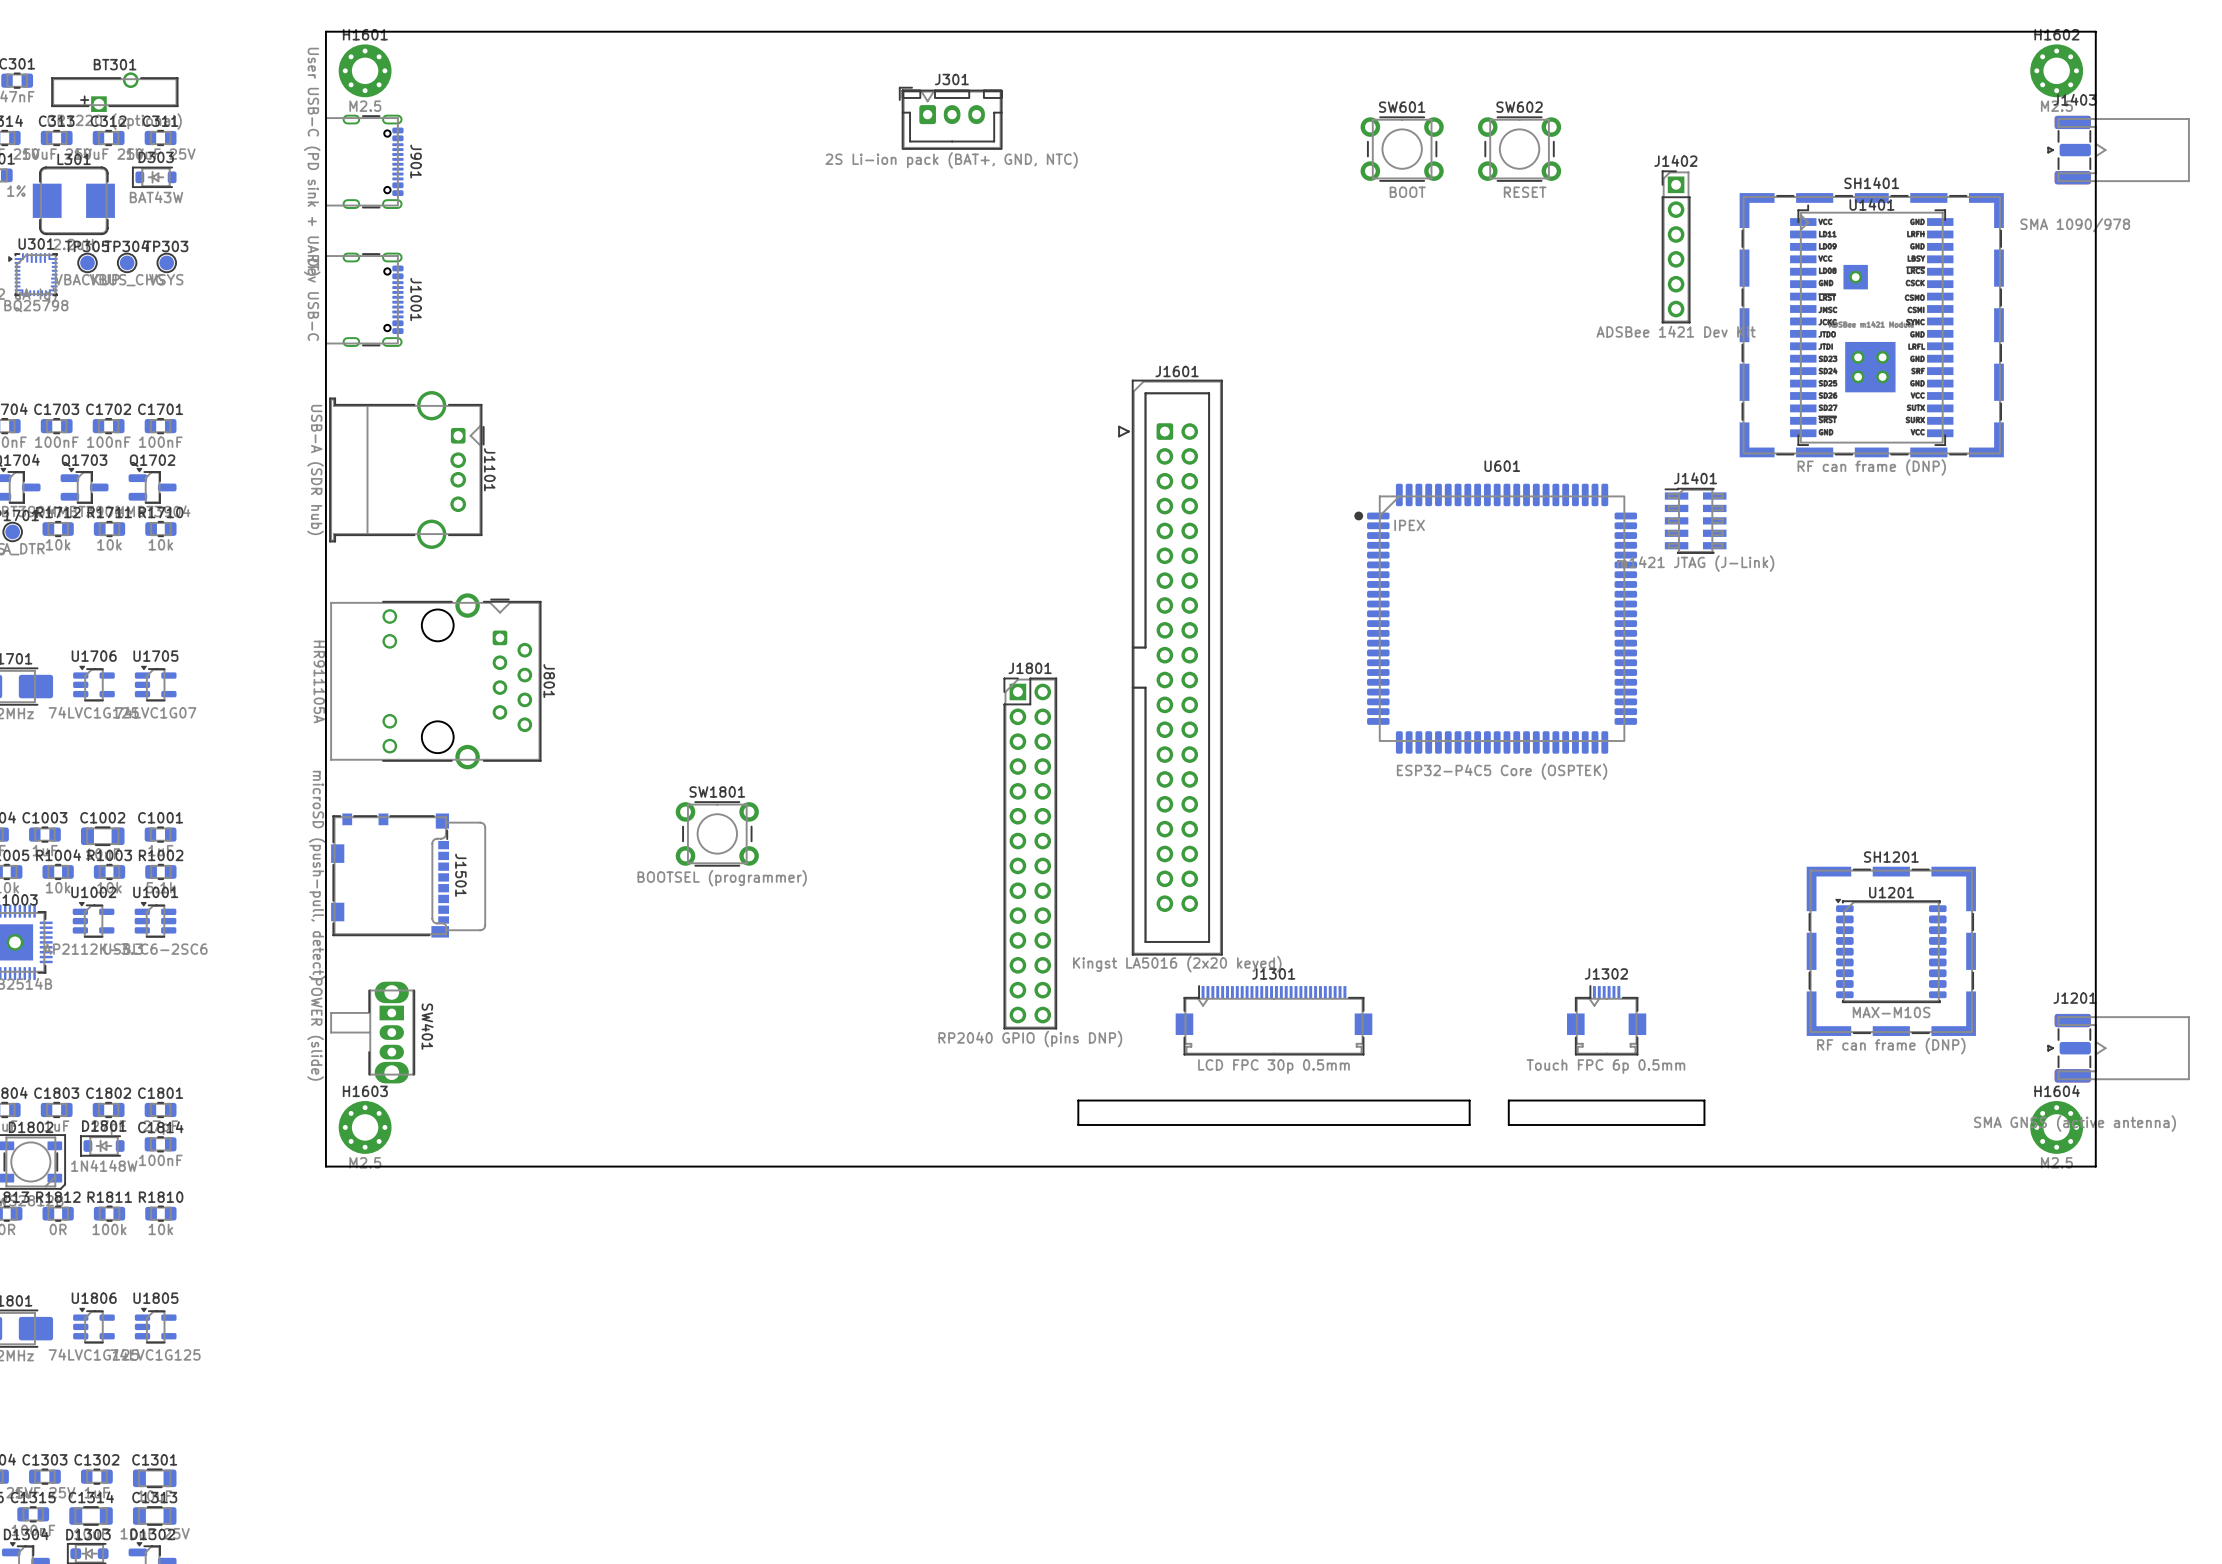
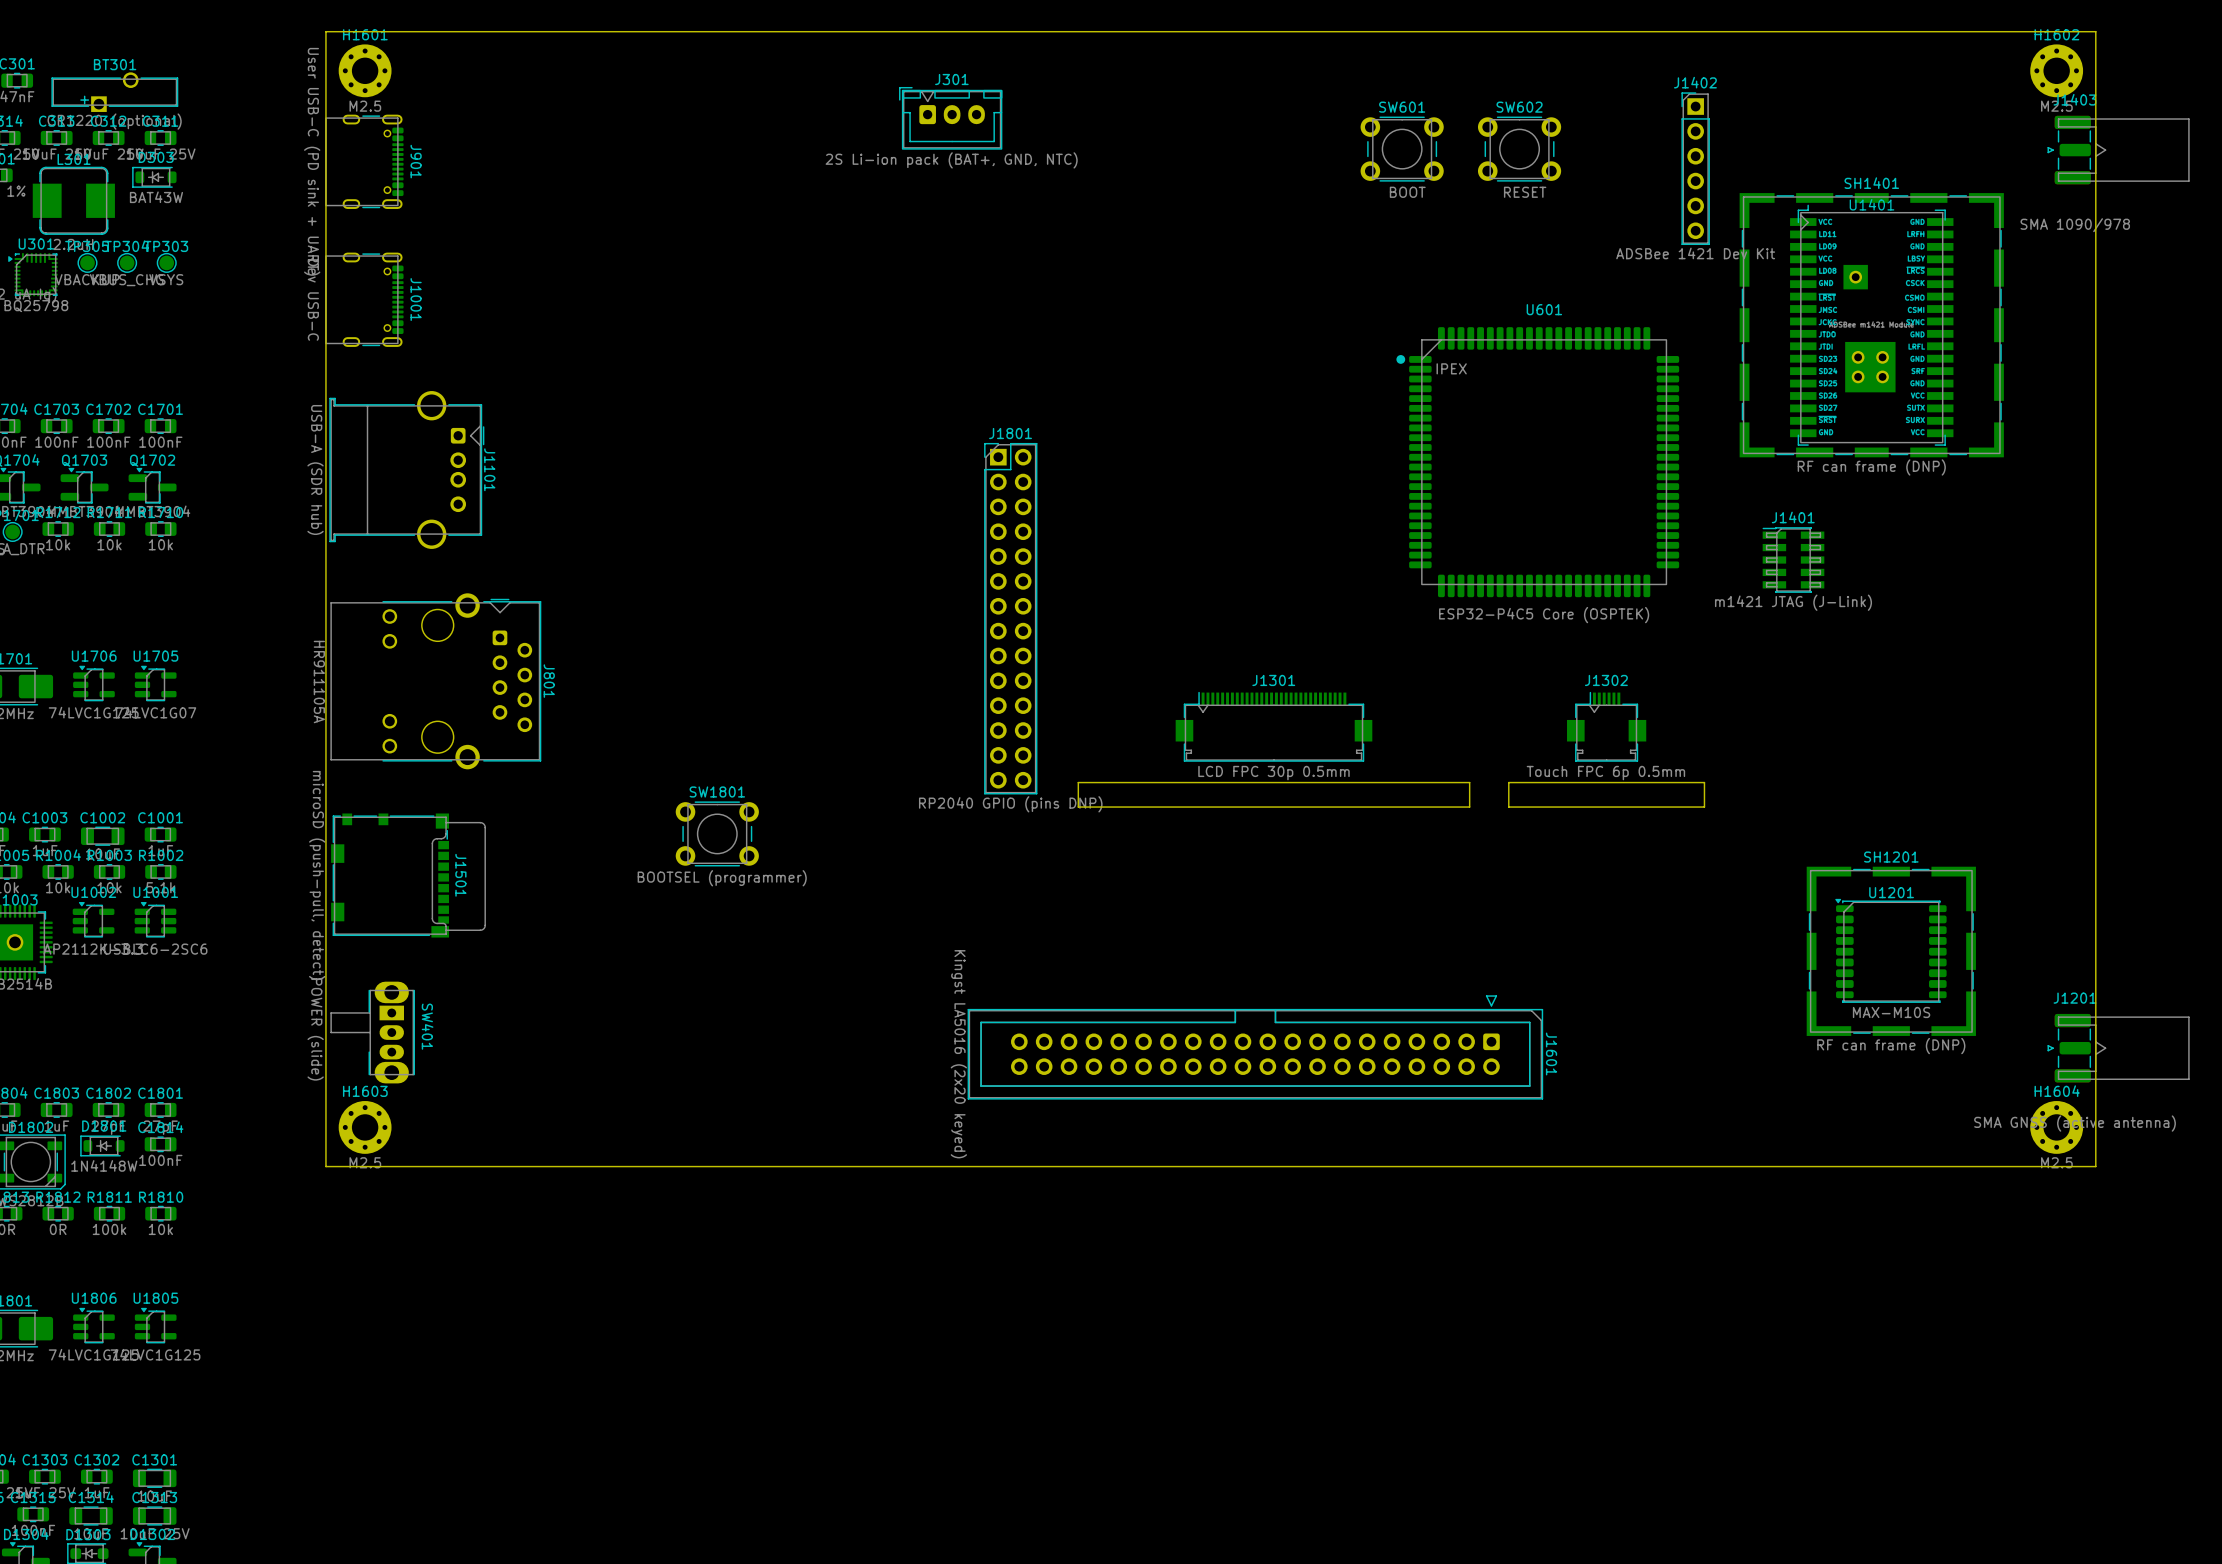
J1402 position: (1676, 246) -> (1695, 168)
J1401 position: (1695, 520) -> (1793, 560)
U601 position: (1495, 618) -> (1537, 462)
J1601 rotation: 0° (1170, 667) -> 90° clockwise (1255, 1047)
J1601 position: (1170, 667) -> (1255, 1047)
board edge: none -> (1469, 782) (1078, 782) (1078, 807) (1469, 807) (1469, 782)
board edge: none -> (1704, 782) (1508, 782) (1508, 807) (1704, 807) (1704, 782)
J1801 position: (1030, 853) -> (1010, 618)
J1301 position: (1273, 1020) -> (1273, 726)
J1302 position: (1606, 1020) -> (1606, 726)
board edge: (1469, 1100) (1078, 1100) (1078, 1124) (1469, 1124) (1469, 1100) -> none
board edge: (1704, 1100) (1508, 1100) (1508, 1124) (1704, 1124) (1704, 1100) -> none

